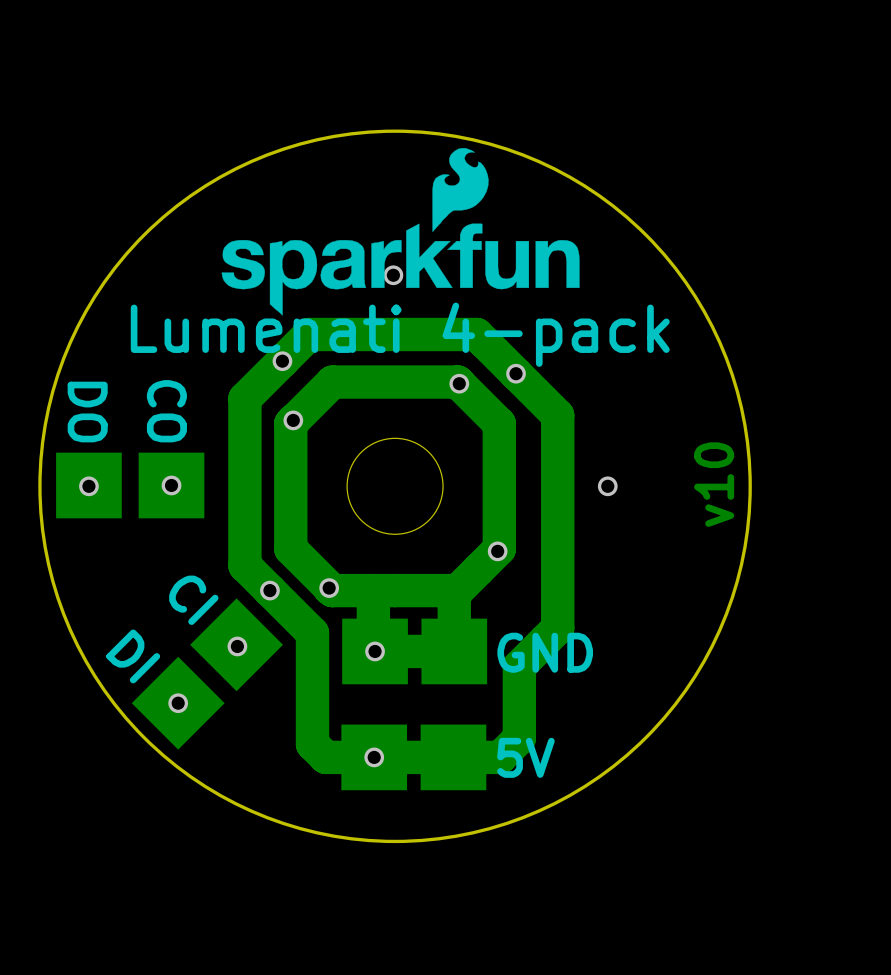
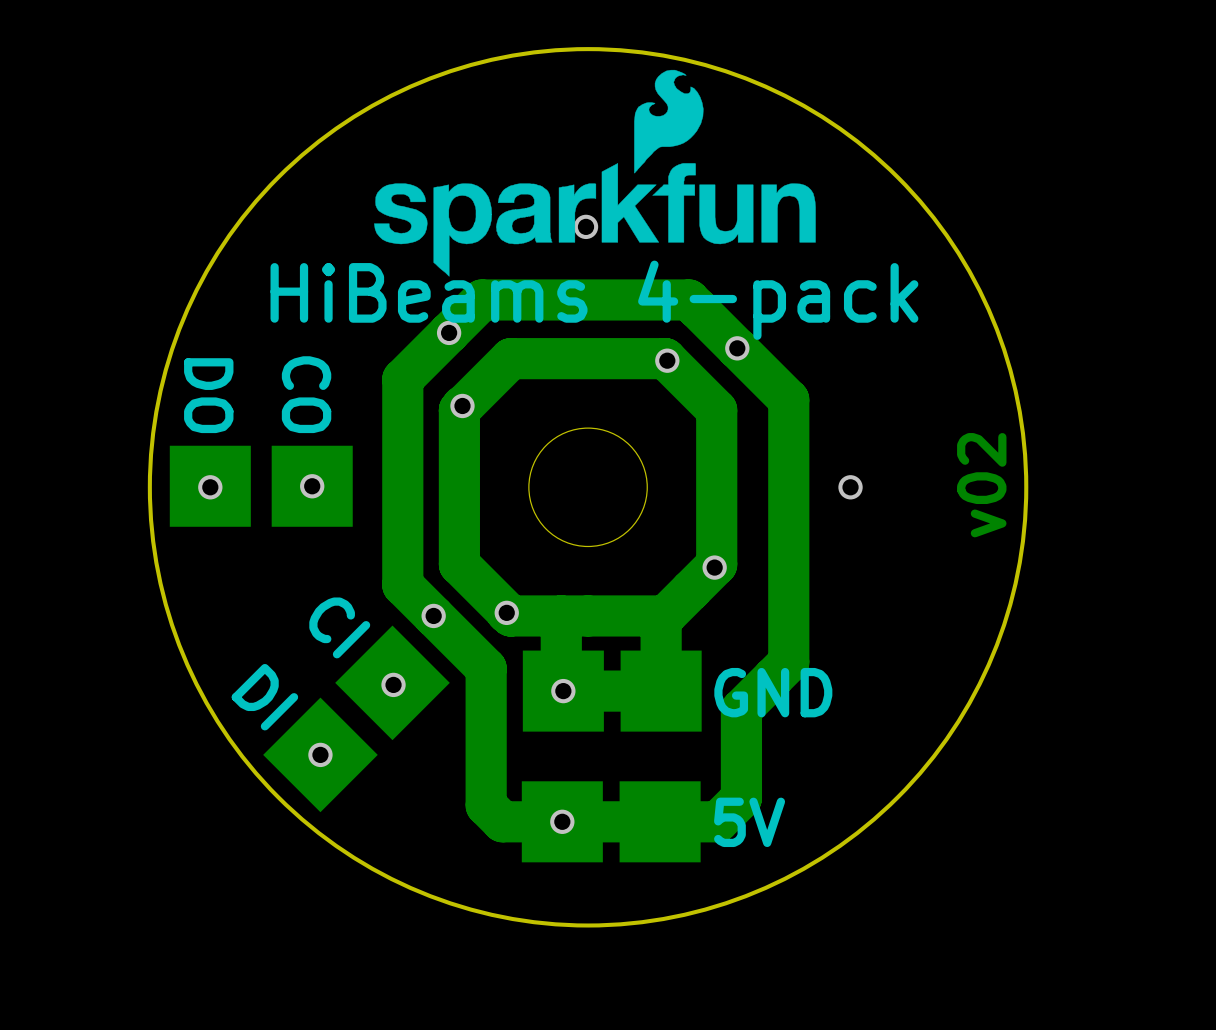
text: Lumenati 4-pack (400, 334) -> HiBeams 4-pack (594, 300)
text: v10 (714, 484) -> v02 (981, 485)

